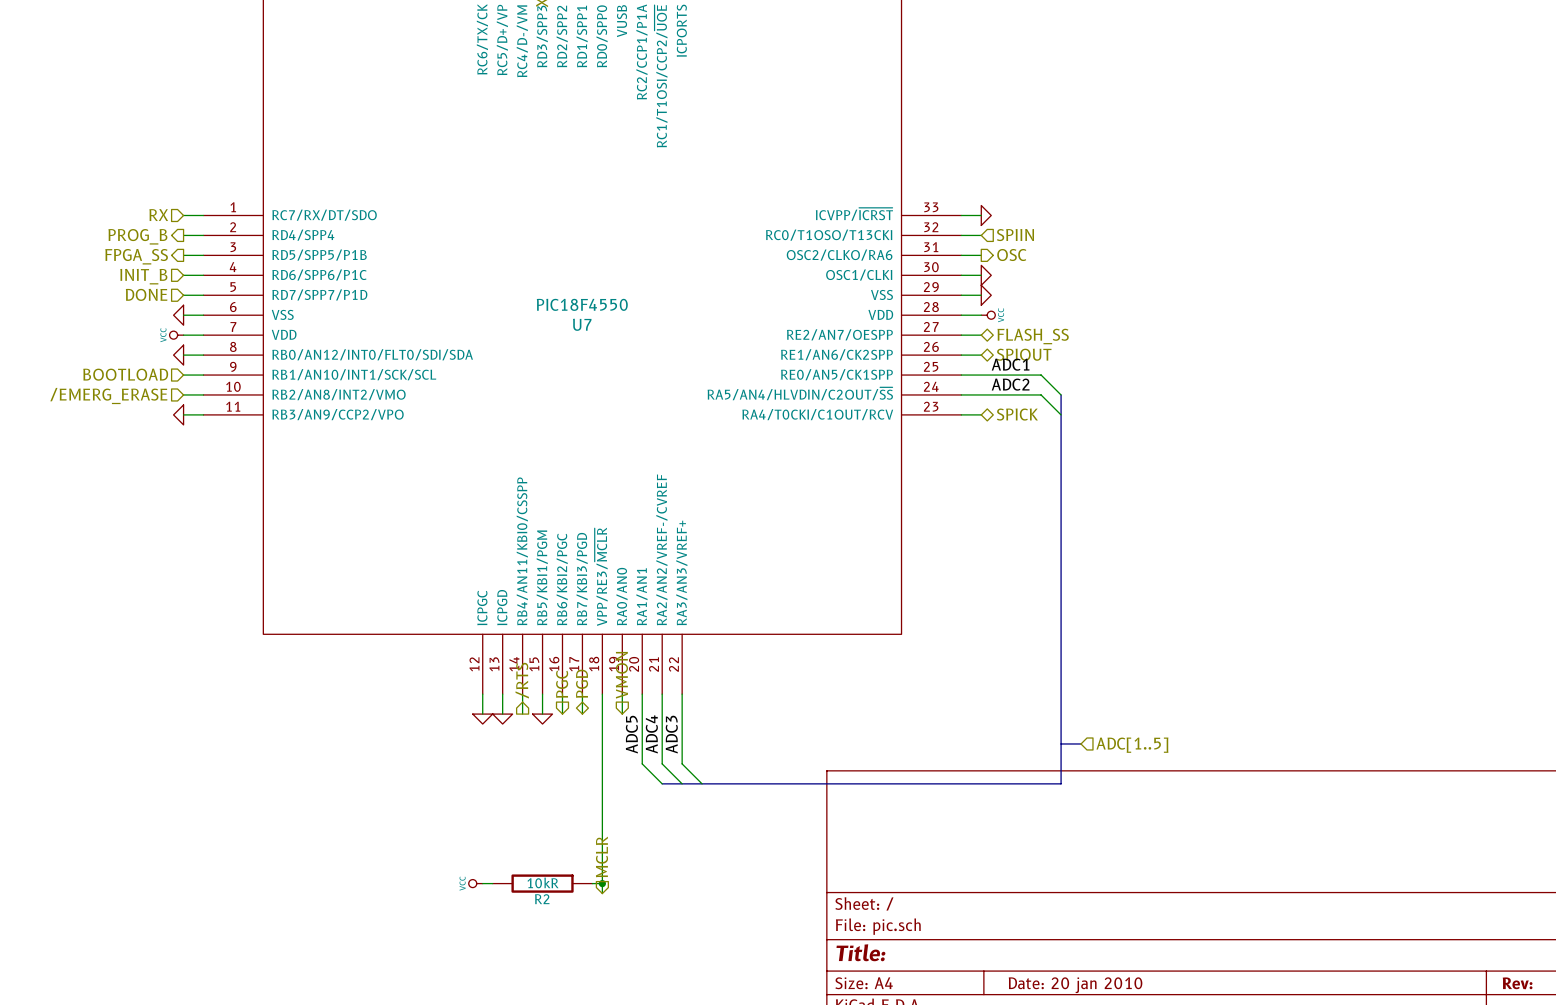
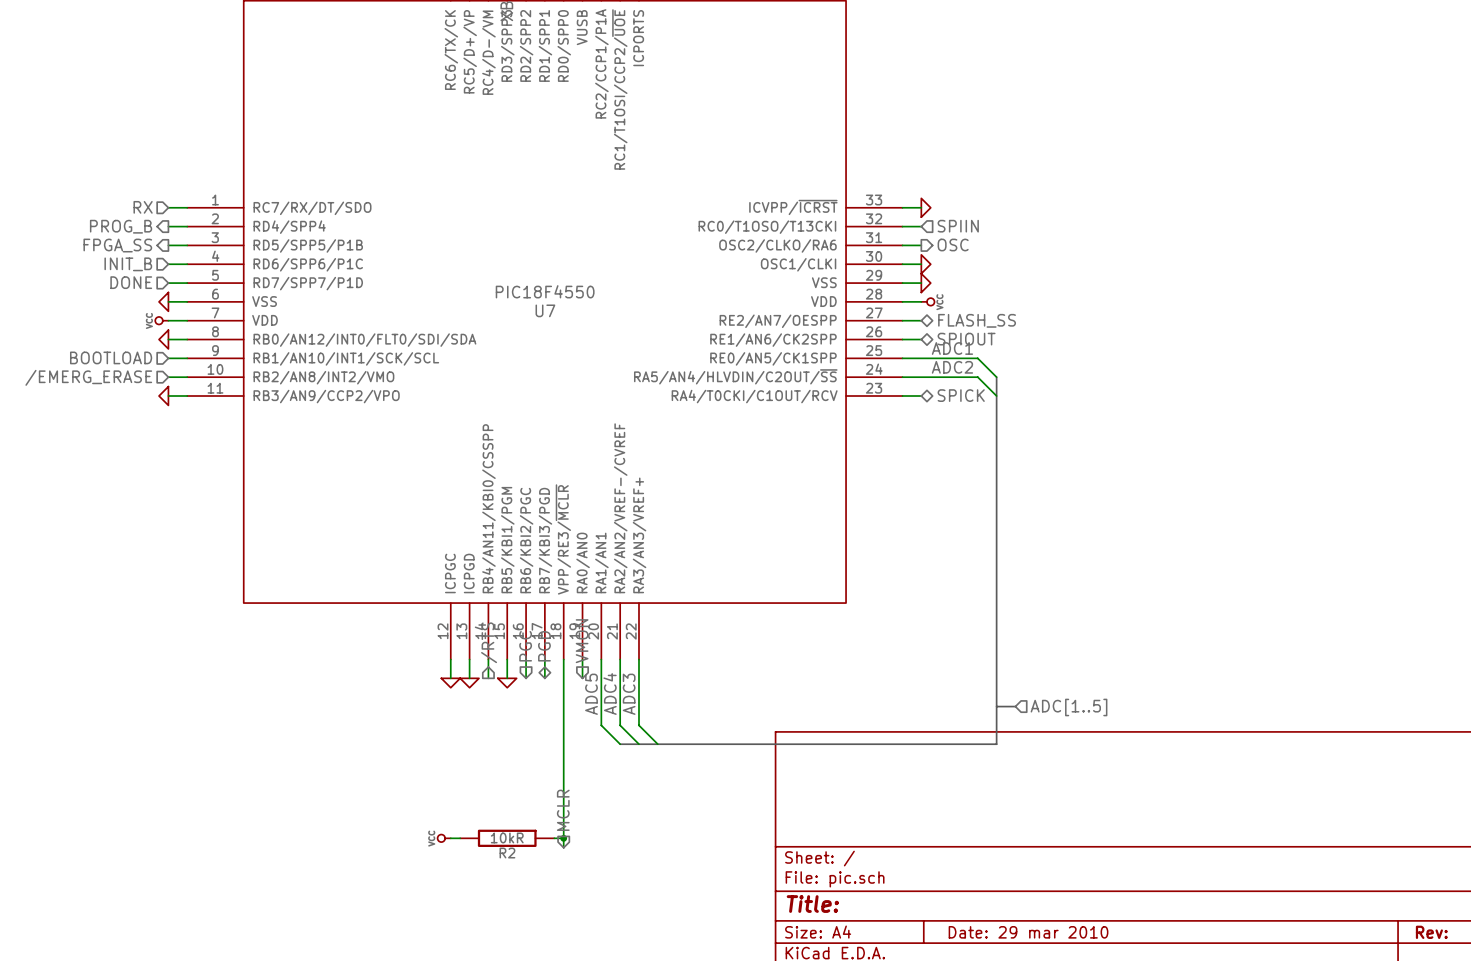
title block: Date: 20 jan 2010 (1075, 985) -> Date: 29 mar 2010 (1028, 932)

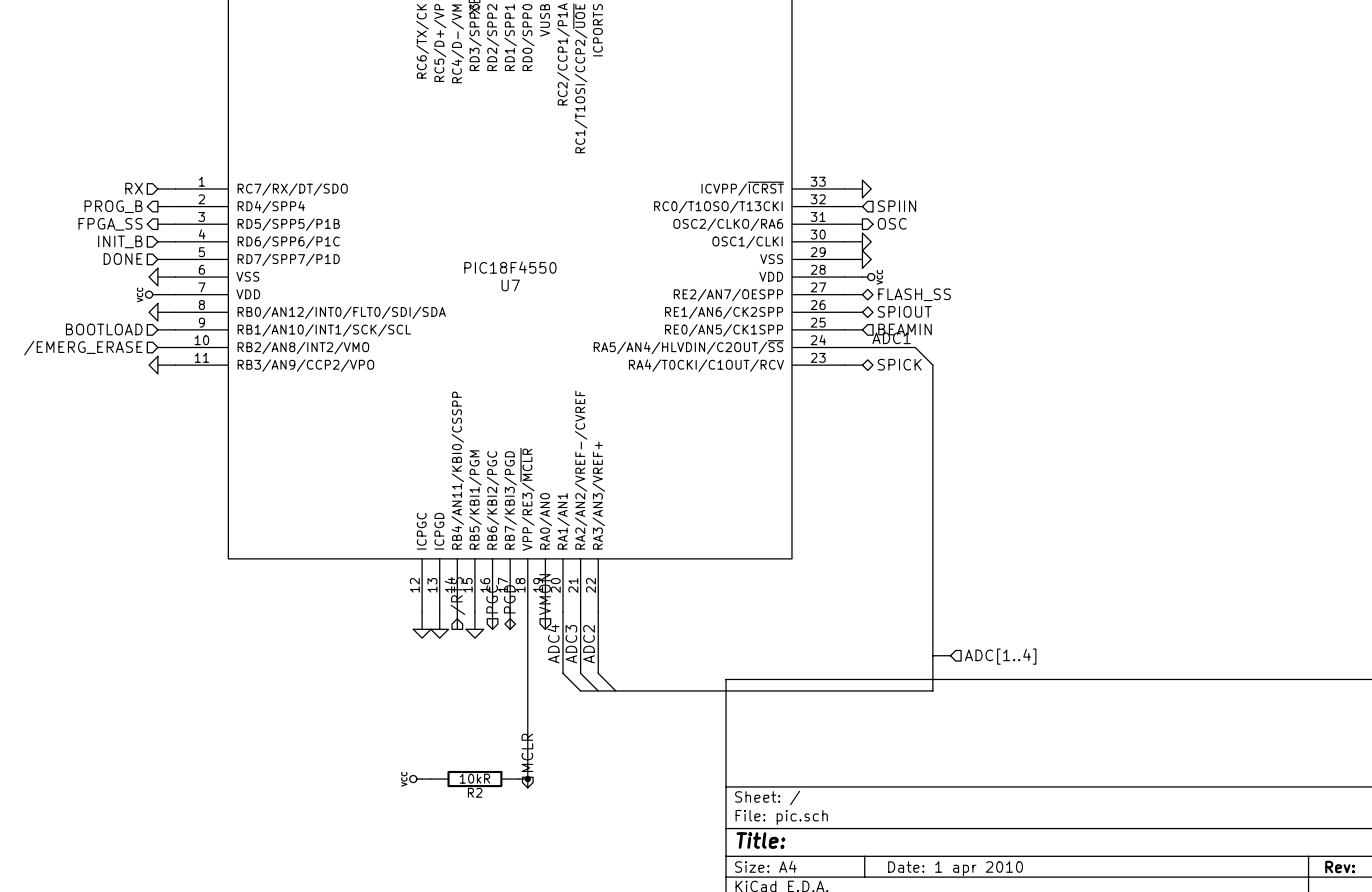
label: ADC1 (952, 348) -> none
hierarchical label: none -> BEAMIN (905, 329)
wire: (921, 358) (977, 358) (996, 377) -> none
label: ADC2 (952, 367) -> ADC1 (891, 338)
bus: (996, 377) (996, 396) -> none
label: ADC4 (610, 693) -> ADC3 (571, 644)
label: ADC5 (591, 694) -> ADC4 (553, 643)
label: ADC3 (629, 694) -> ADC2 (589, 644)
hierarchical label: ADC[1..5] (1069, 707) -> ADC[1..4] (1000, 656)
title block: Date: 29 mar 2010 (1028, 932) -> Date: 1 apr 2010 (955, 868)

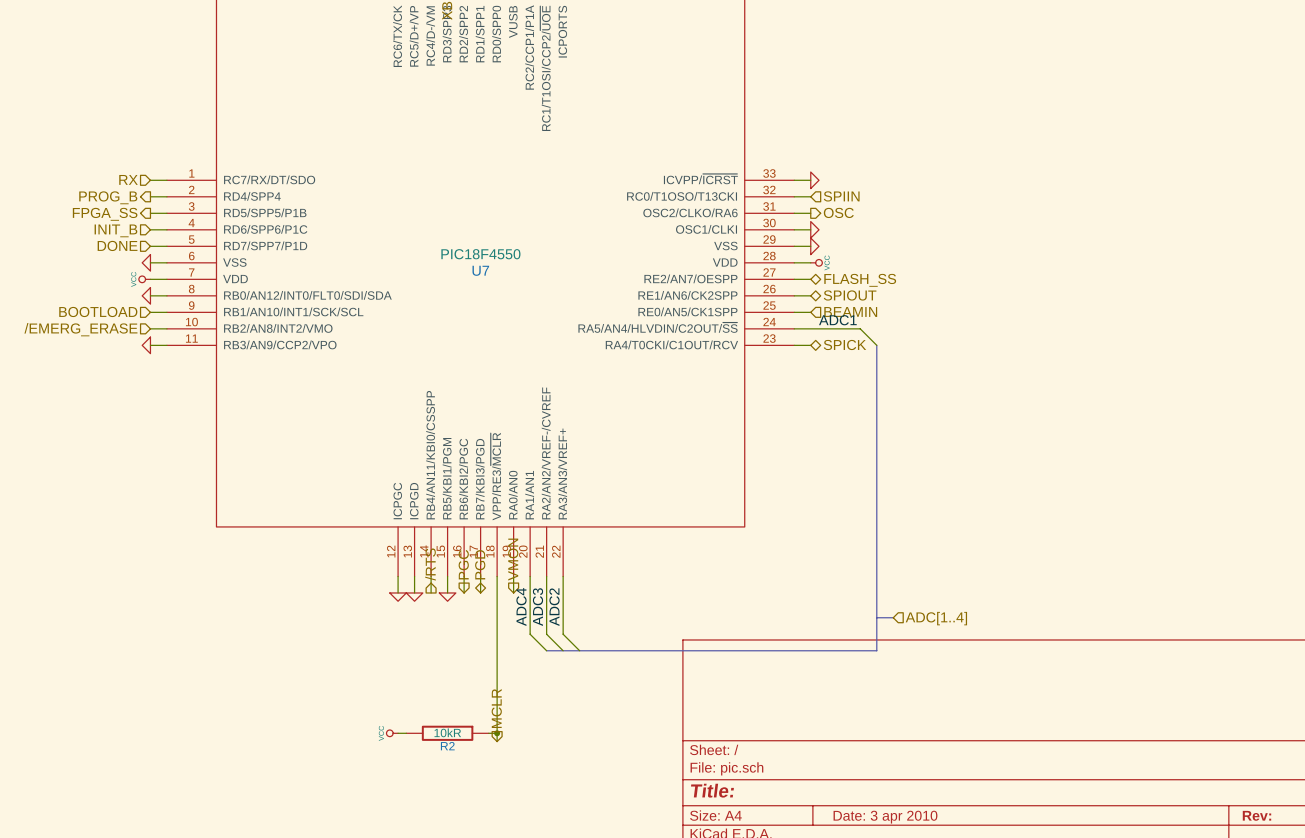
title block: Date: 1 apr 2010 (955, 868) -> Date: 3 apr 2010 (885, 817)

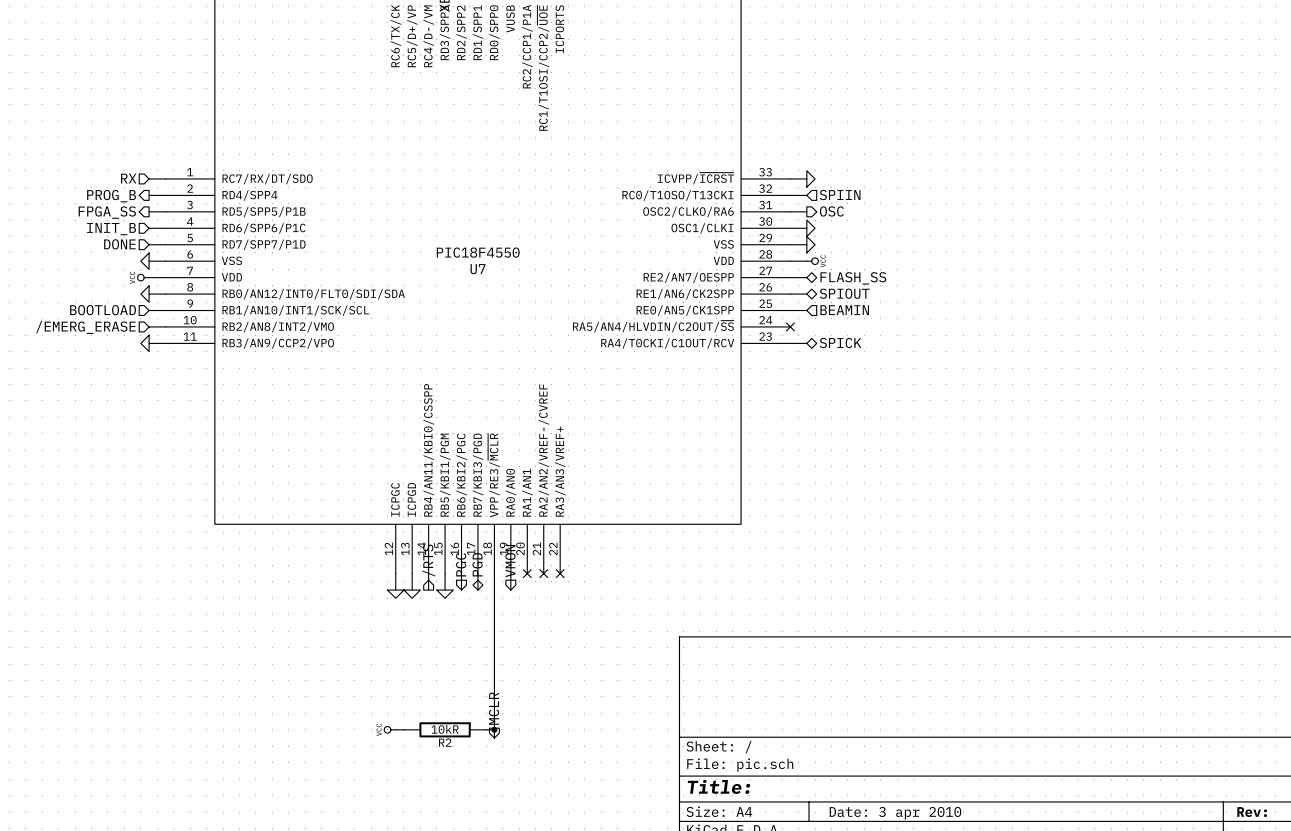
label: ADC1 (837, 320) -> none
wire: (794, 328) (860, 328) (876, 345) -> none
no-connect mark: none -> (790, 326)
bus: (876, 345) (876, 650) (546, 650) -> none
wire: (530, 576) (530, 634) (546, 650) -> none
no-connect mark: none -> (527, 573)
wire: (546, 576) (546, 634) (563, 650) -> none
no-connect mark: none -> (543, 573)
wire: (563, 576) (563, 634) (579, 650) -> none
no-connect mark: none -> (560, 573)
label: ADC4 (521, 607) -> none
label: ADC3 (537, 607) -> none
label: ADC2 (554, 607) -> none
bus: (876, 617) (893, 617) -> none
hierarchical label: ADC[1..4] (936, 618) -> none

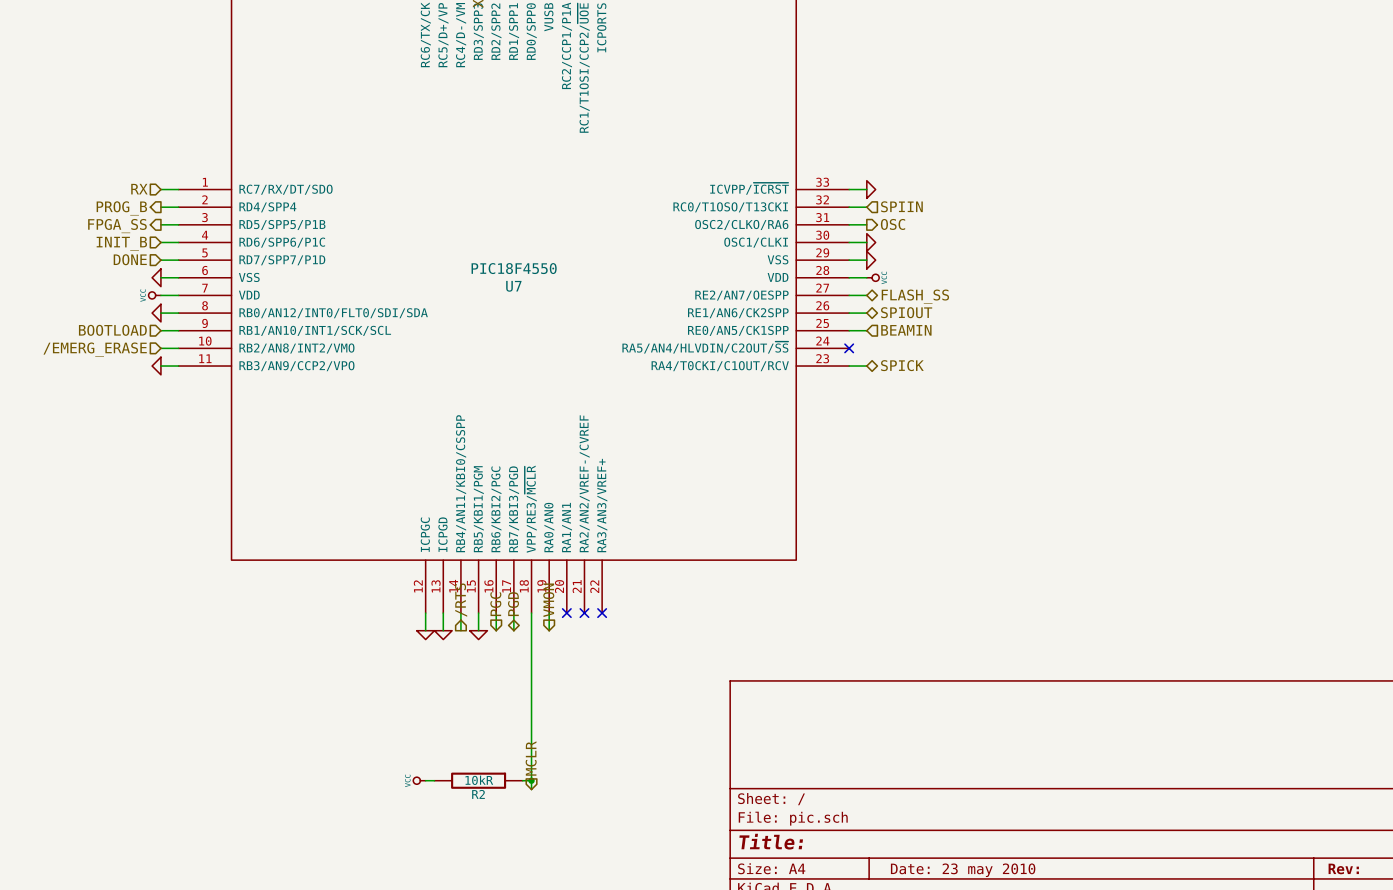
title block: Date: 3 apr 2010 (895, 813) -> Date: 23 may 2010 (963, 870)

